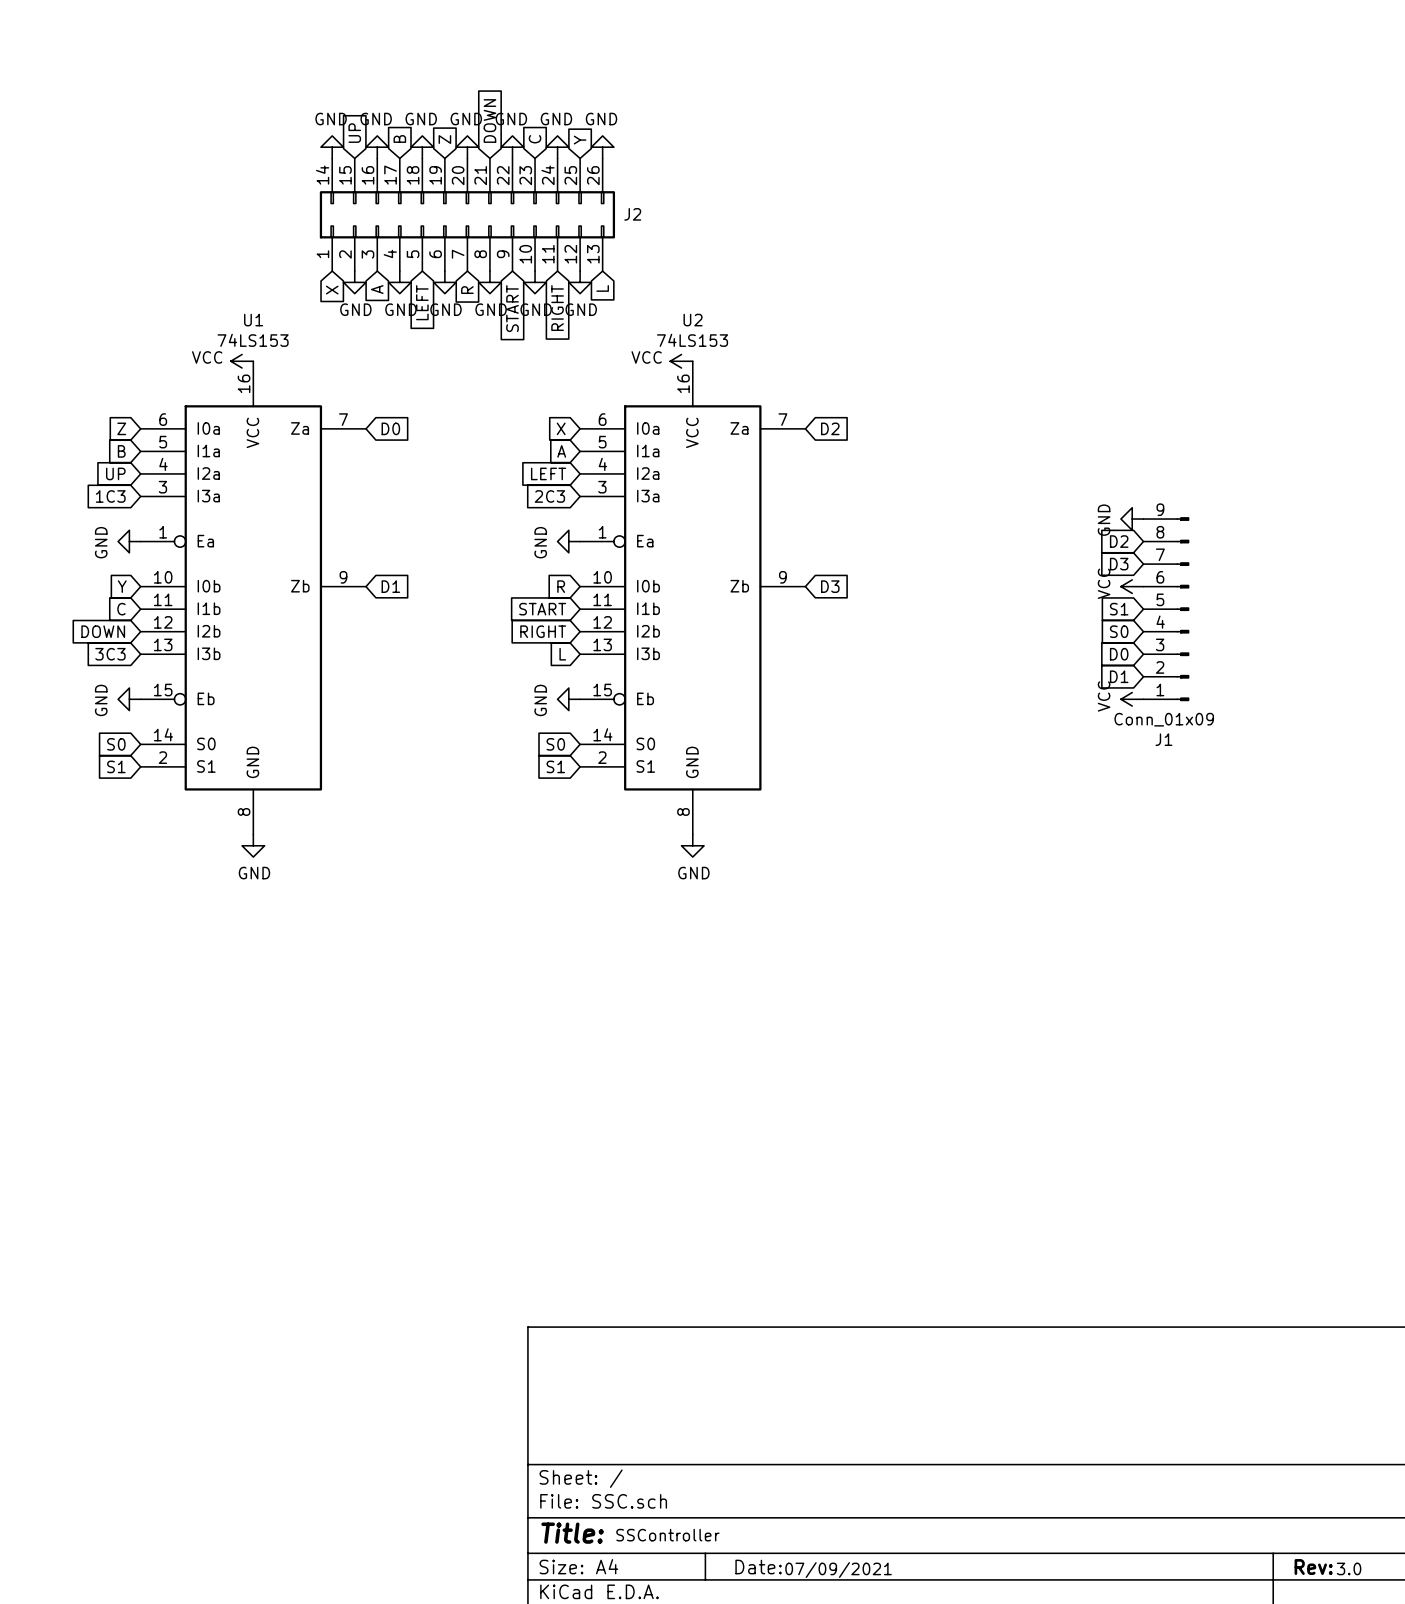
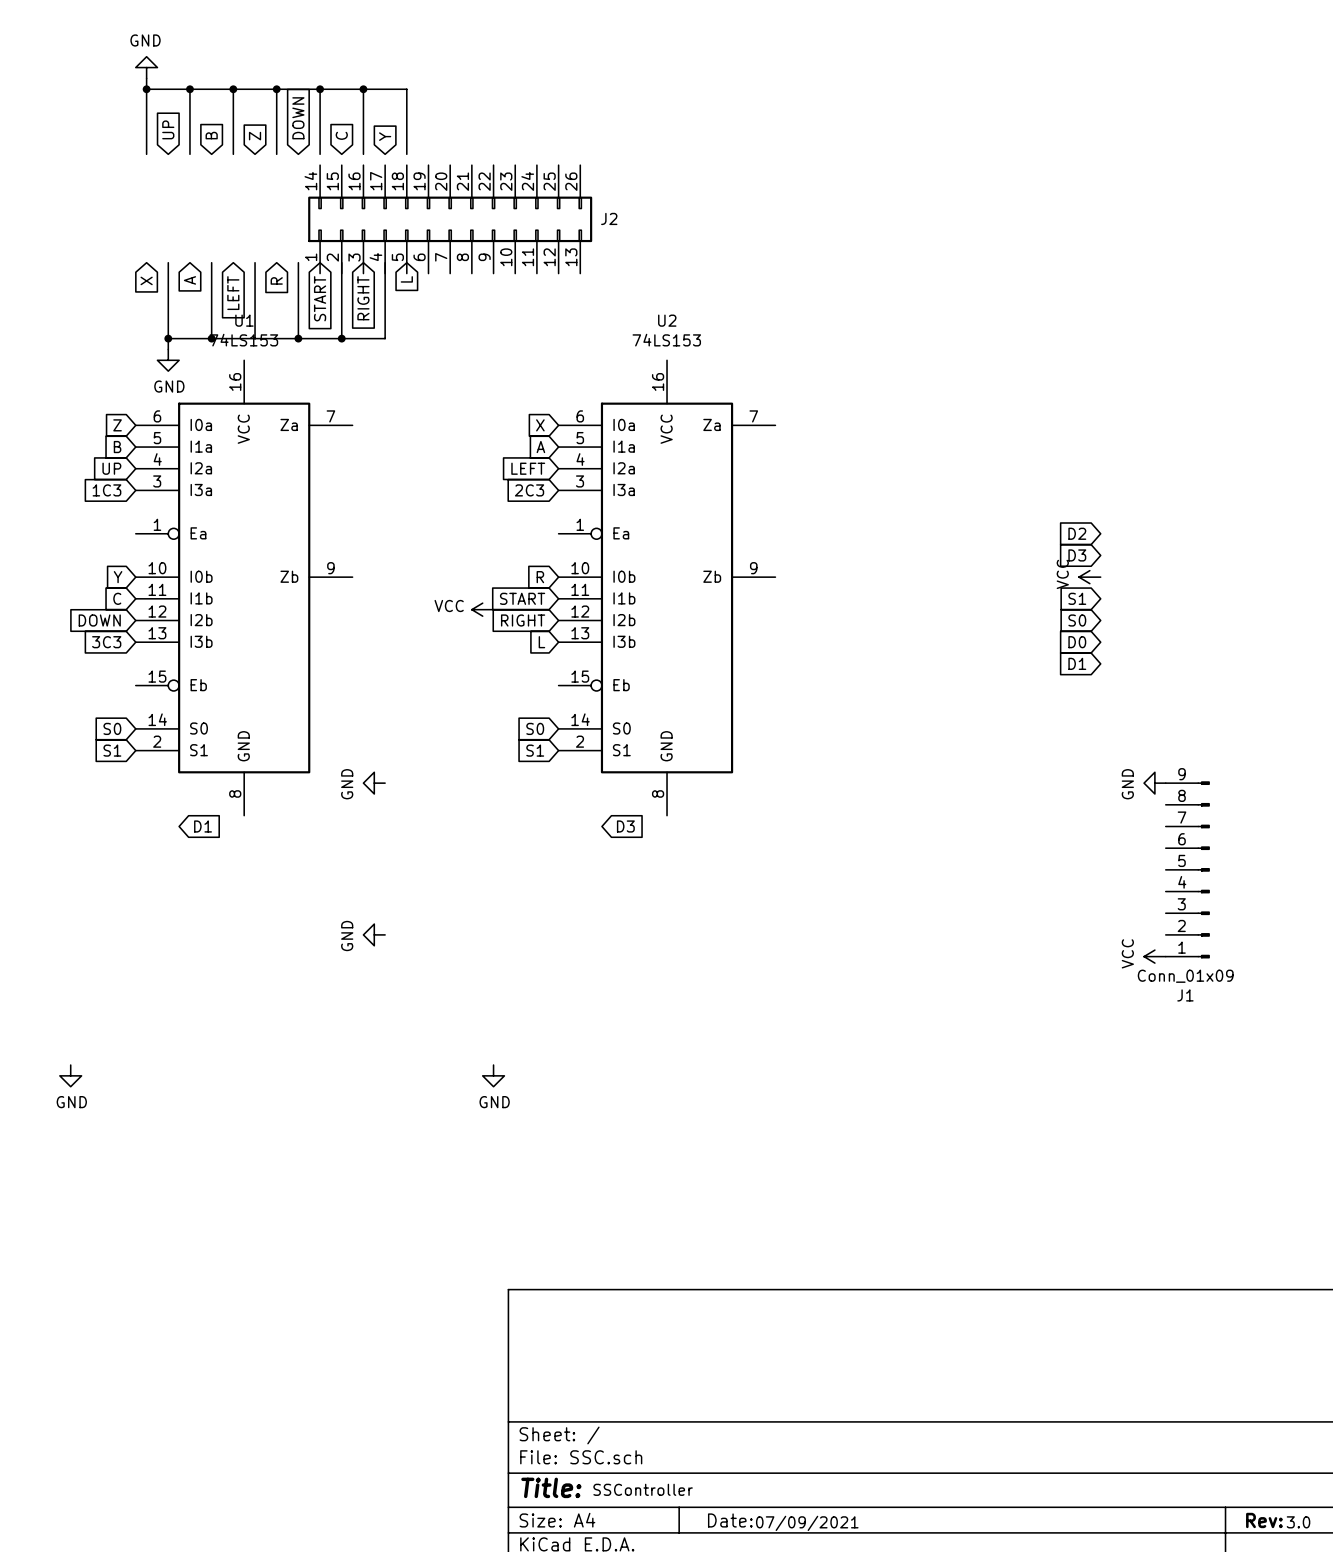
power symbol: none -> GND (146, 67)
wire: none -> (146, 78) (146, 154)
wire: none -> (146, 89) (406, 89) (406, 154)
junction: none -> (146, 89)
wire: none -> (189, 89) (189, 154)
junction: none -> (189, 89)
wire: none -> (233, 89) (233, 154)
junction: none -> (233, 89)
wire: none -> (276, 89) (276, 154)
junction: none -> (276, 89)
wire: none -> (320, 89) (320, 154)
junction: none -> (320, 89)
wire: none -> (363, 89) (363, 154)
junction: none -> (363, 89)
global label position: DOWN (489, 121) -> DOWN (298, 118)
global label position: UP (354, 133) -> UP (168, 129)
global label position: B (399, 138) -> B (211, 135)
global label position: Z (444, 139) -> Z (255, 136)
global label position: C (535, 139) -> C (341, 135)
global label position: Y (580, 140) -> Y (385, 136)
power symbol: GND (332, 147) -> none
power symbol: GND (377, 147) -> none
power symbol: GND (422, 147) -> none
power symbol: GND (467, 147) -> none
power symbol: GND (512, 147) -> none
power symbol: GND (557, 147) -> none
power symbol: GND (602, 147) -> none
wire: none -> (168, 262) (168, 349)
wire: none -> (211, 262) (211, 338)
wire: none -> (255, 262) (255, 338)
wire: none -> (298, 262) (298, 338)
wire: none -> (341, 262) (341, 338)
wire: none -> (385, 262) (385, 338) (168, 338)
power symbol: GND (354, 282) -> none
power symbol: GND (399, 282) -> none
power symbol: GND (444, 282) -> none
power symbol: GND (489, 282) -> none
power symbol: GND (535, 282) -> none
power symbol: GND (580, 282) -> none
global label position: L (602, 288) -> L (406, 279)
global label position: A (377, 289) -> A (189, 280)
global label position: X (332, 290) -> X (146, 280)
global label position: R (467, 290) -> R (276, 280)
global label position: LEFT (422, 302) -> LEFT (233, 293)
global label position: START (512, 308) -> START (320, 298)
global label position: RIGHT (557, 308) -> RIGHT (363, 298)
junction: none -> (168, 338)
junction: none -> (211, 338)
junction: none -> (298, 338)
junction: none -> (341, 338)
power symbol: none -> GND (168, 360)
power symbol: VCC (242, 361) -> none
power symbol: VCC (681, 361) -> none
global label: D0 (390, 428) -> none
global label: D2 (830, 428) -> none
power symbol: GND (1132, 519) -> none
power symbol: GND (129, 541) -> none
power symbol: GND (568, 541) -> none
global label: D1 (390, 586) -> none
global label: D3 (830, 586) -> none
J1 position: (1166, 609) -> (1187, 869)
power symbol: none -> VCC (482, 609)
power symbol: GND (129, 699) -> none
power symbol: GND (568, 699) -> none
power symbol: VCC (1132, 699) -> none
power symbol: none -> GND (374, 783)
power symbol: none -> GND (1154, 783)
global label: none -> D1 (203, 826)
power symbol: GND (253, 845) -> none
global label: none -> D3 (625, 826)
power symbol: GND (692, 845) -> none
power symbol: none -> GND (374, 934)
power symbol: none -> VCC (1154, 956)
power symbol: none -> GND (70, 1075)
power symbol: none -> GND (493, 1075)

